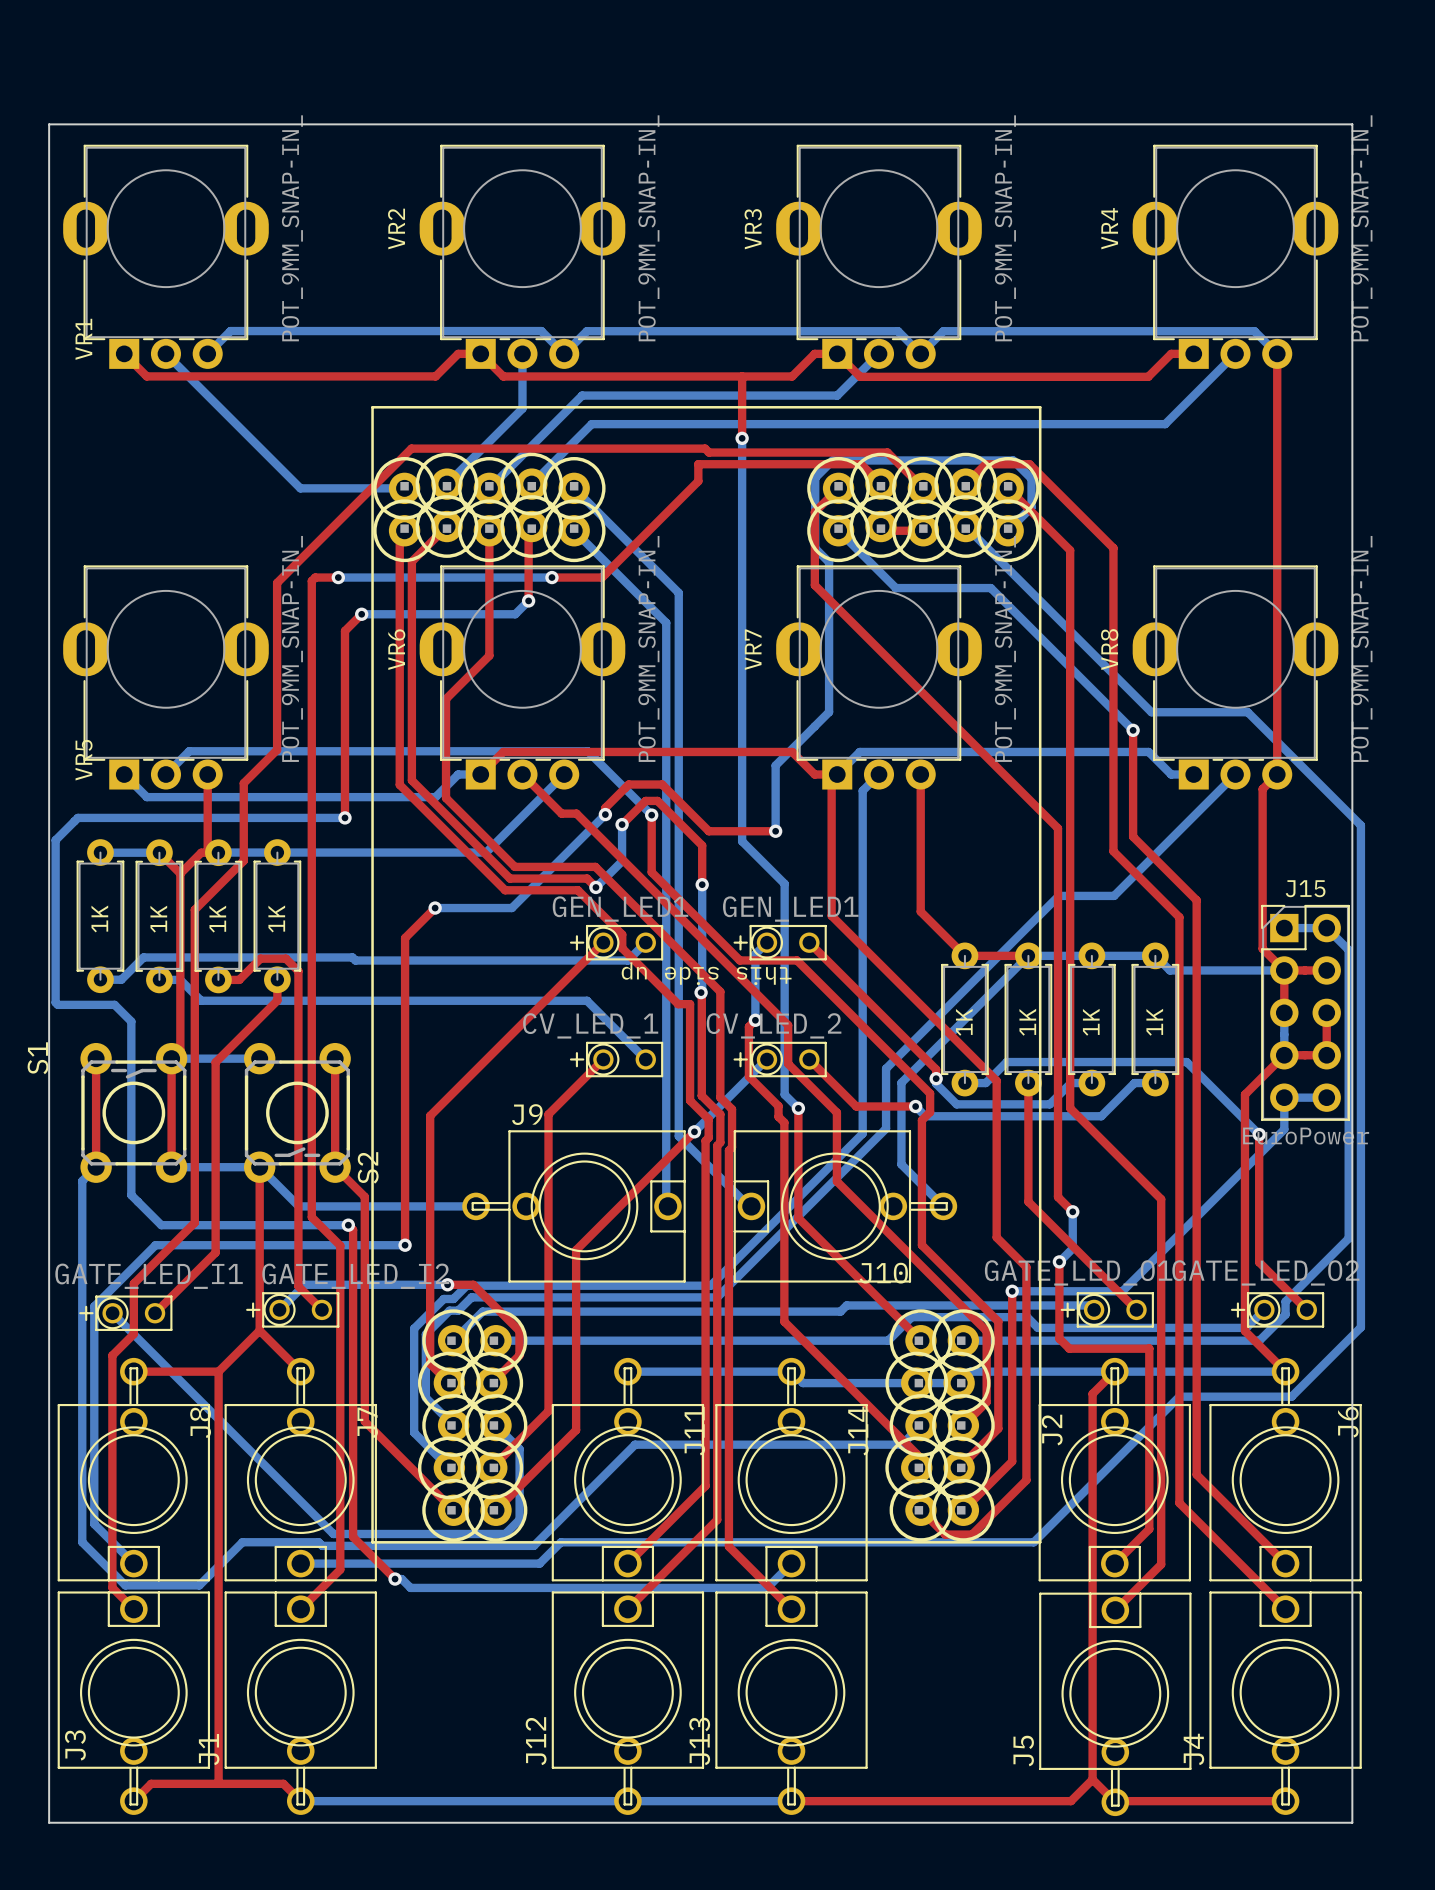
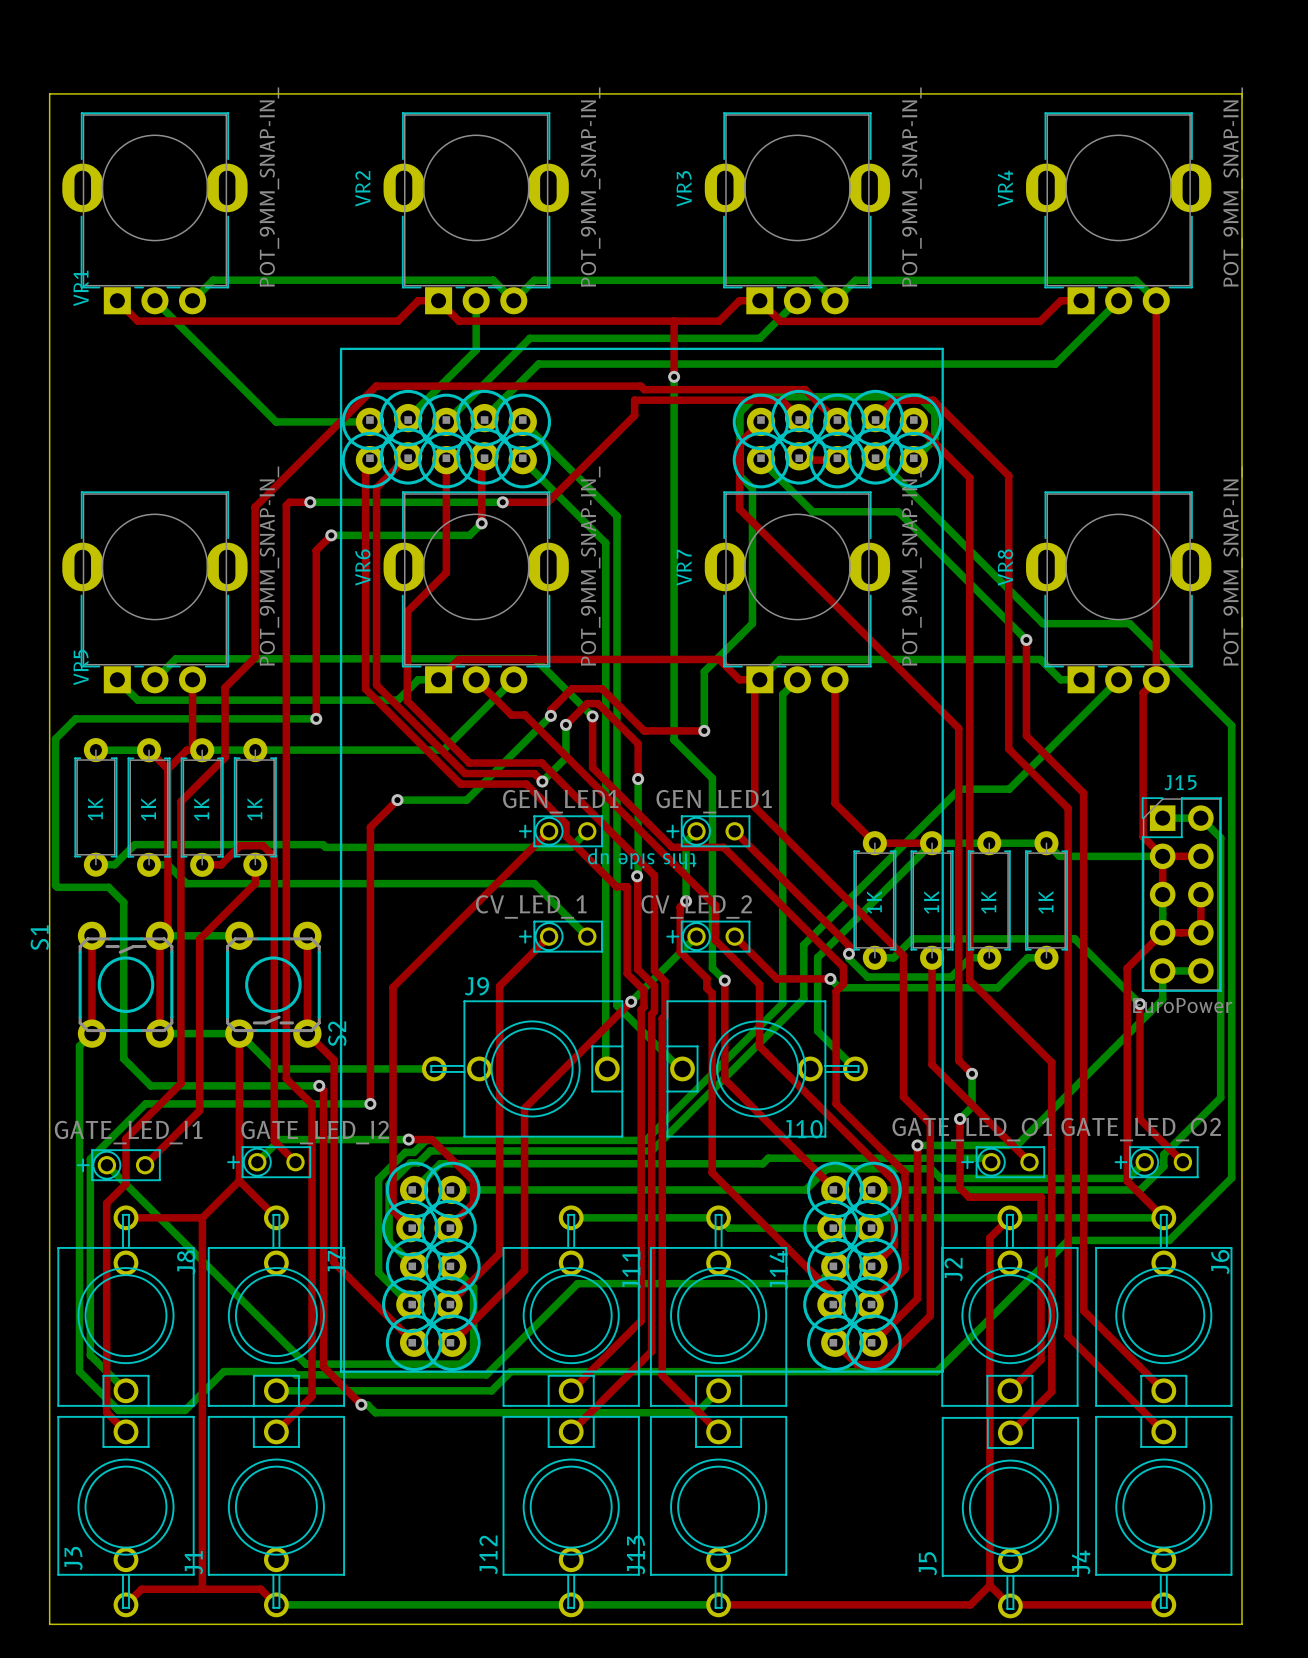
board edge: (1352, 124) (1352, 1822) -> (1223, 93) (1242, 93) (1242, 1624) (1223, 1624)

